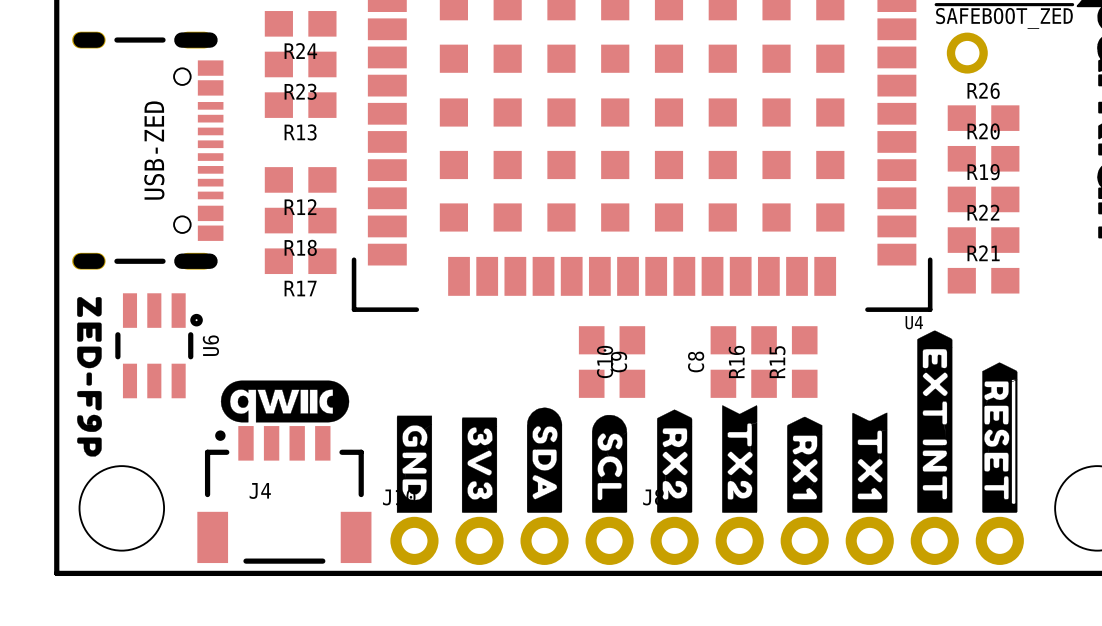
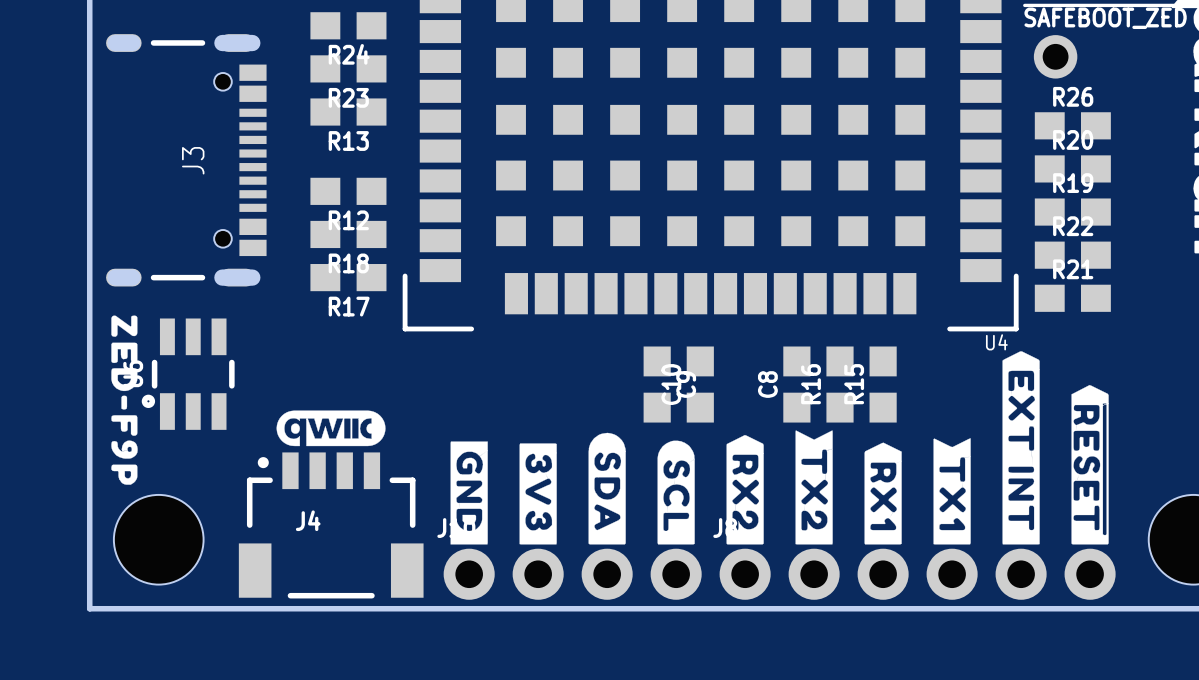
USB-ZED name: USB-ZED (154, 150) -> J3 (193, 160)
U6 rotation: 0° (159, 345) -> 180° (188, 374)
drawing shape: [220, 380, 350, 423] -> [276, 410, 386, 447]

